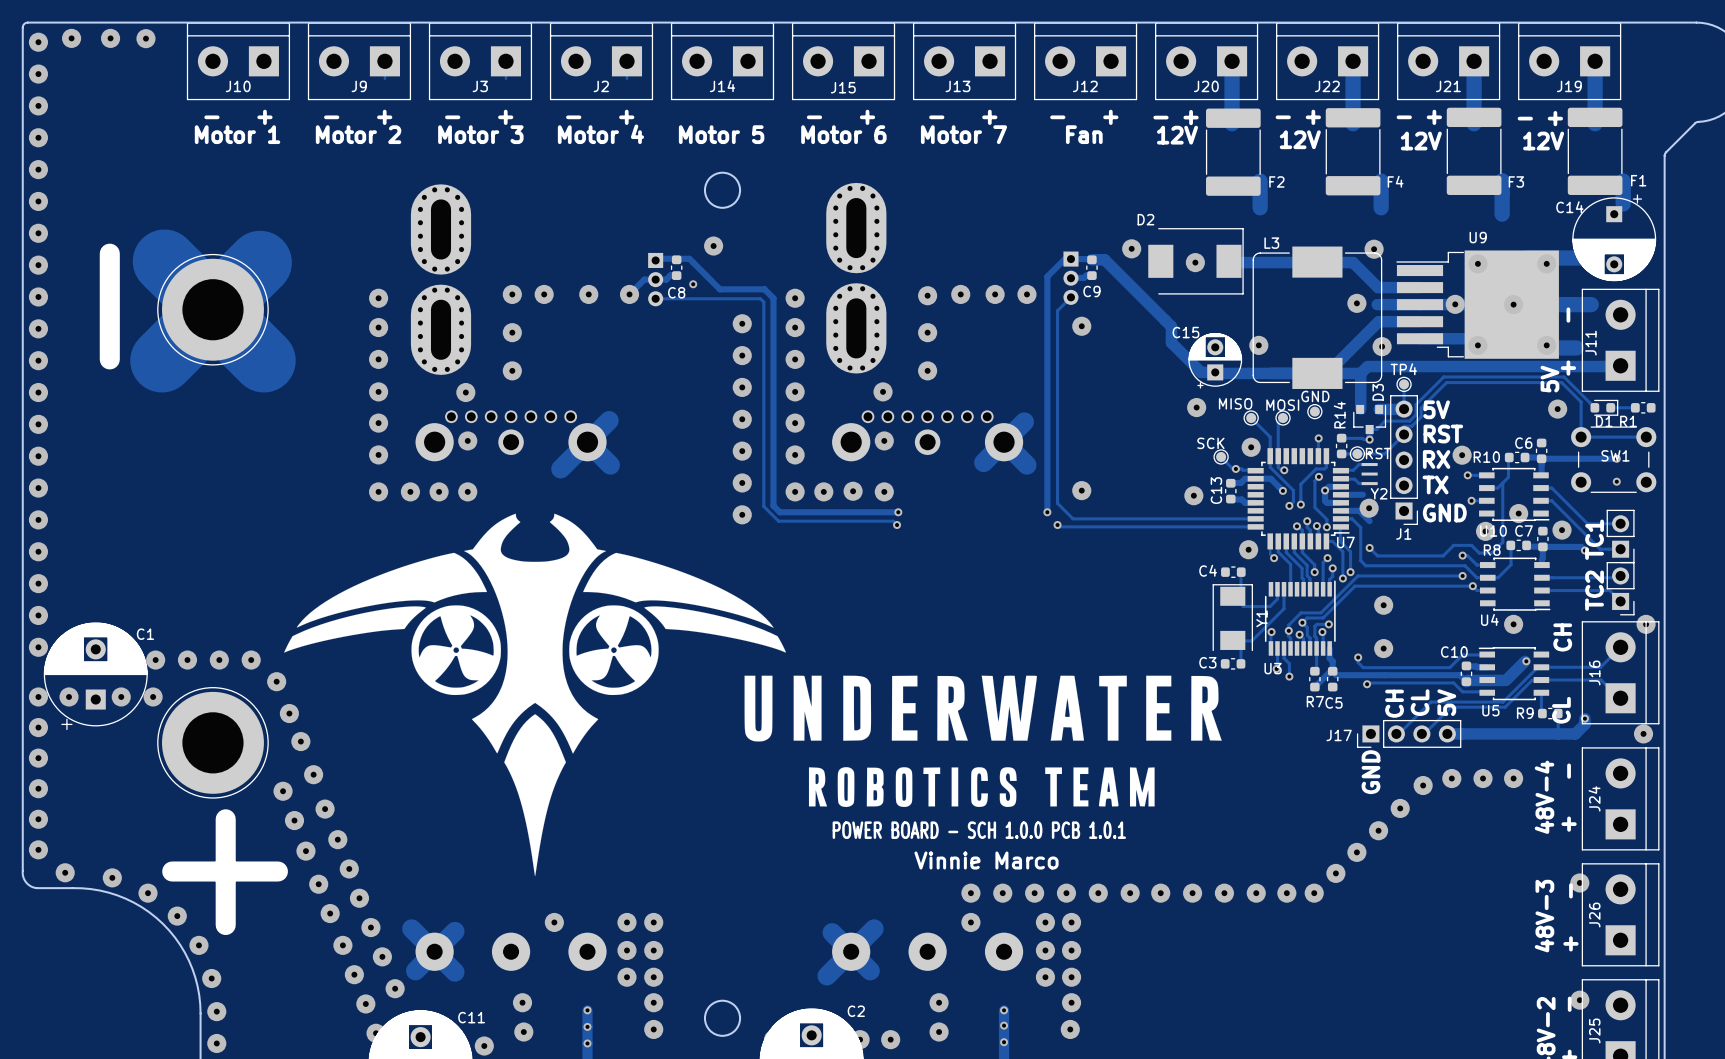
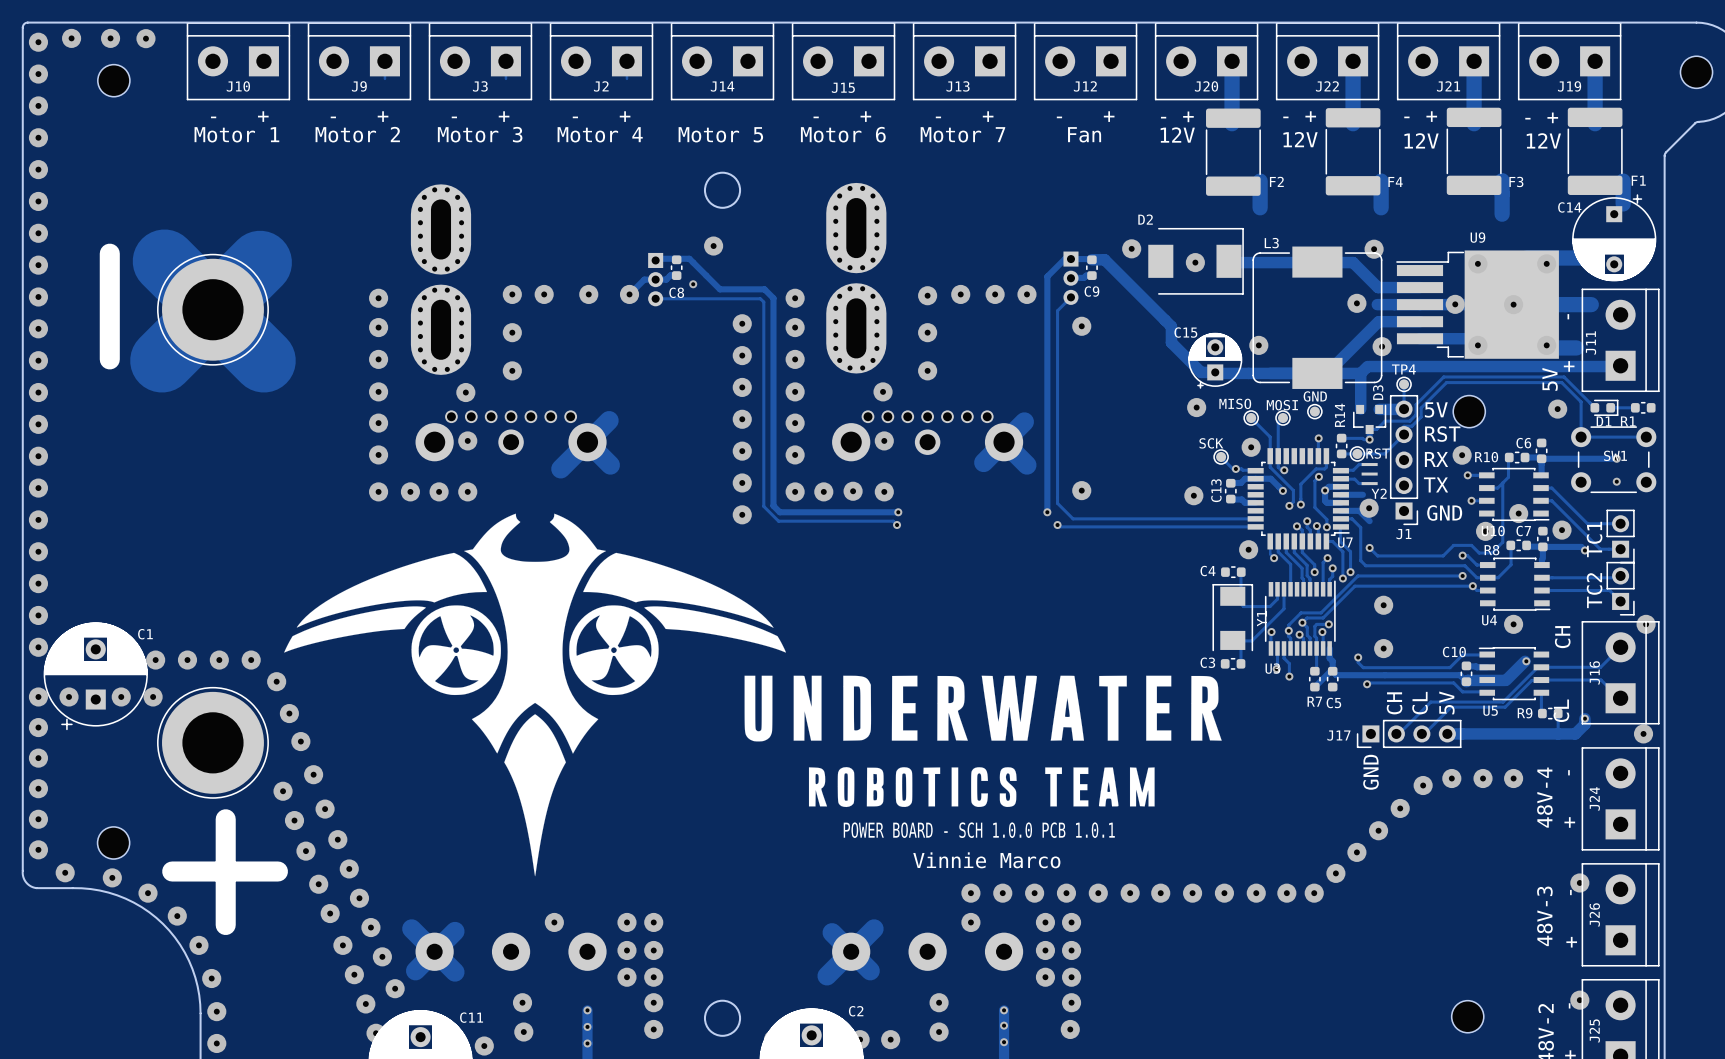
part: none -> (1696, 72)
part: none -> (113, 80)
part: none -> (1469, 411)
part: none -> (113, 842)
part: none -> (1467, 1016)

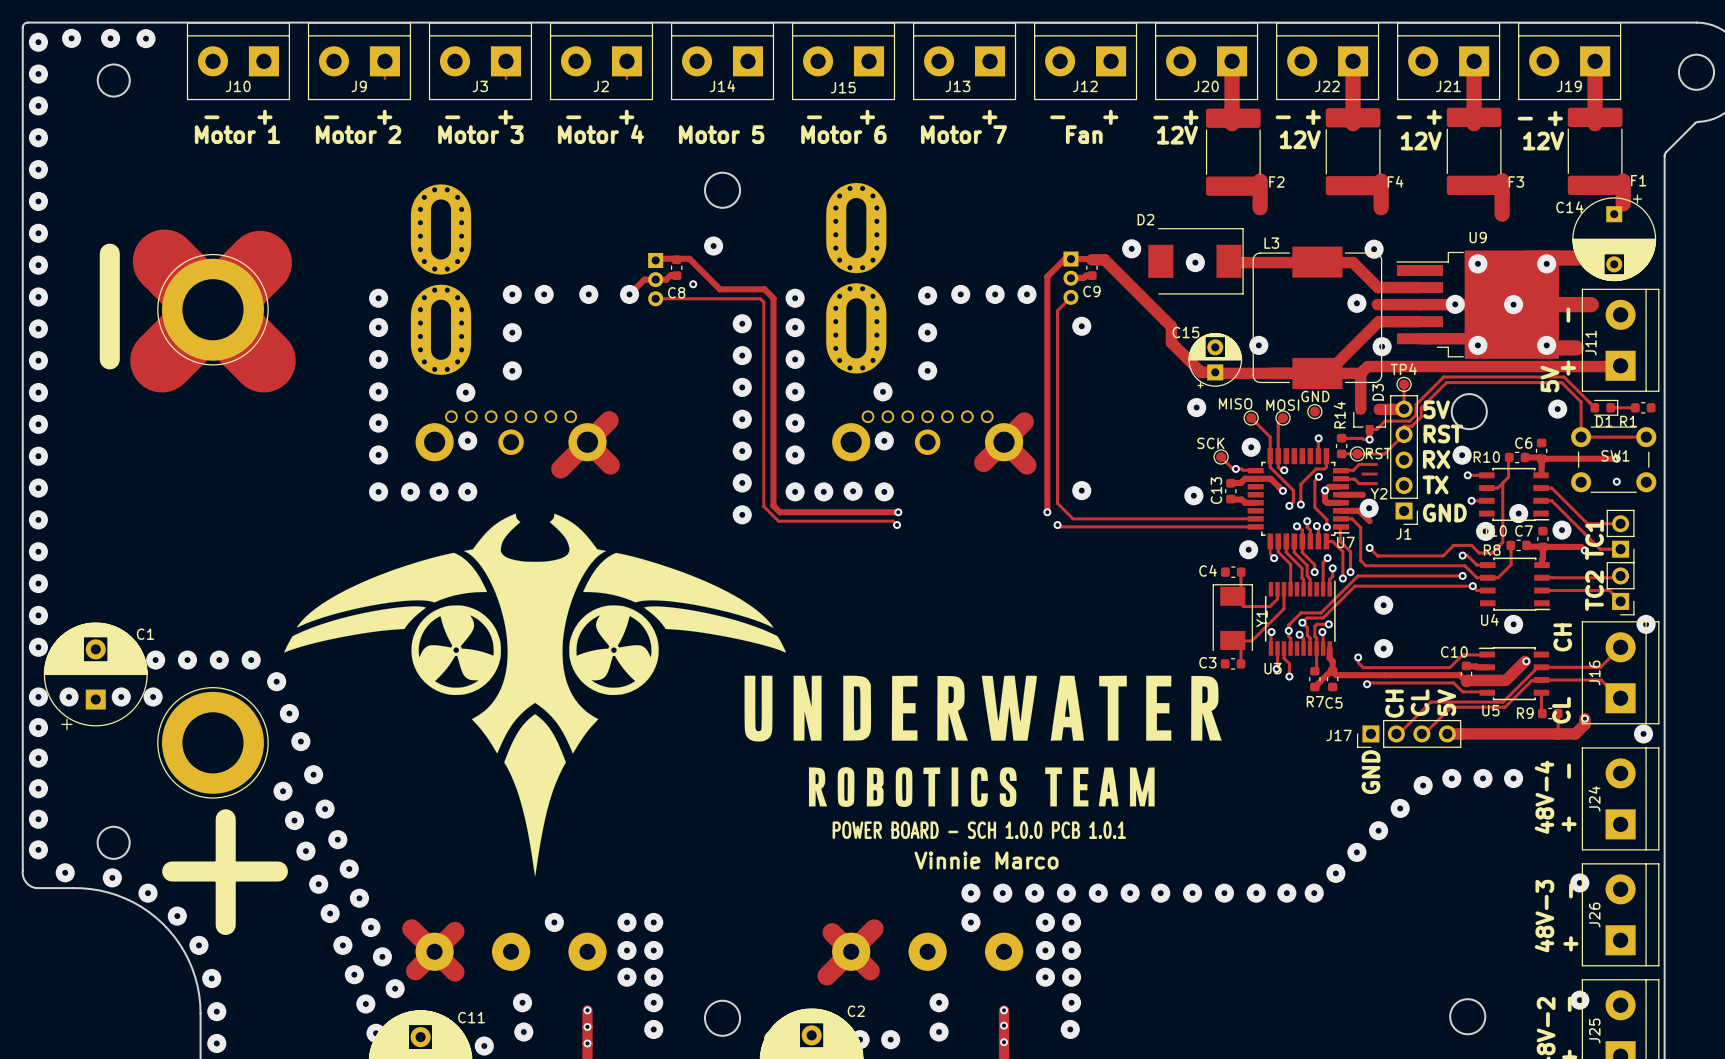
round board edge: none -> [1677, 53, 1716, 91]
round board edge: none -> [96, 63, 131, 98]
part: (1696, 72) -> none
part: (113, 80) -> none
round board edge: none -> [1450, 393, 1488, 431]
part: (1469, 411) -> none
round board edge: none -> [96, 825, 131, 860]
part: (113, 842) -> none
round board edge: none -> [1449, 998, 1487, 1036]
part: (1467, 1016) -> none

